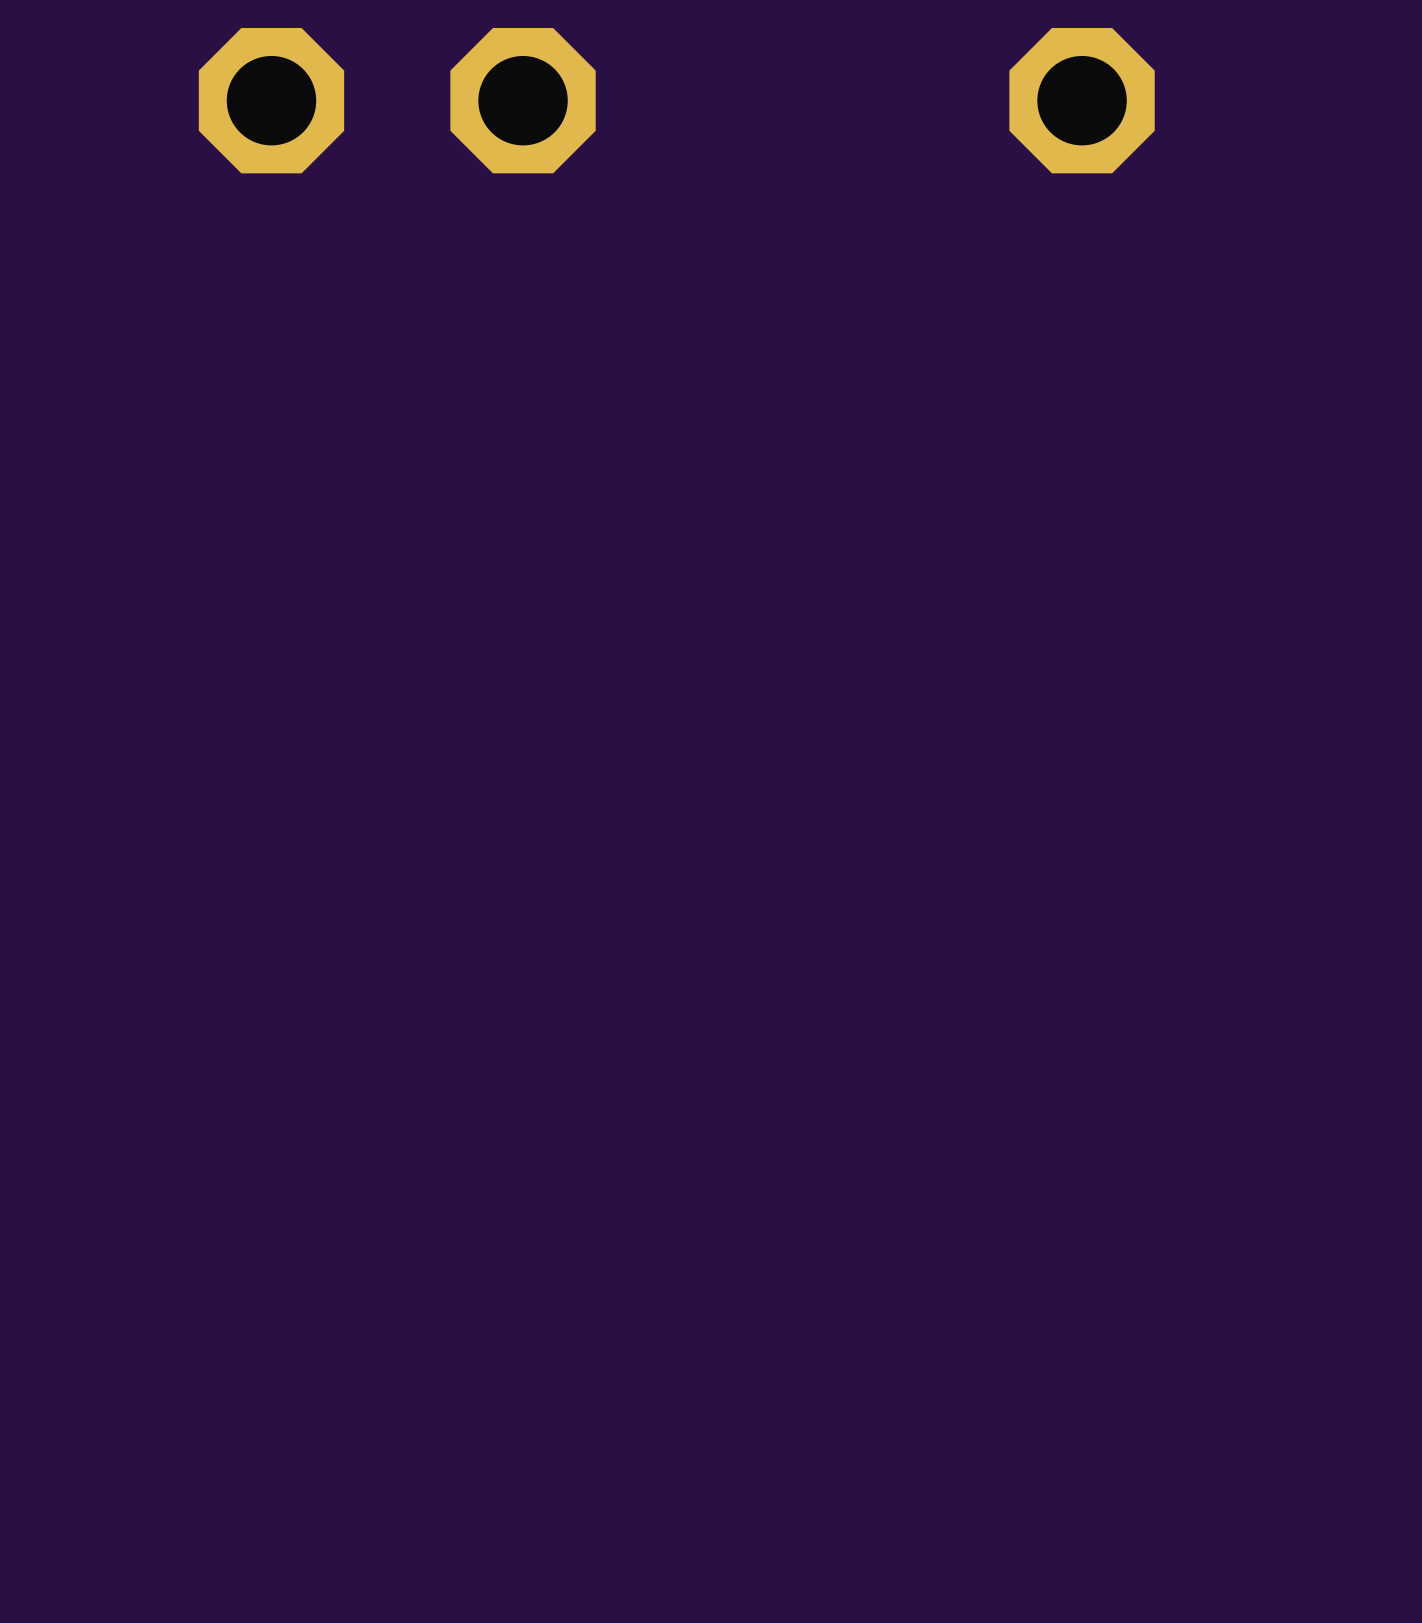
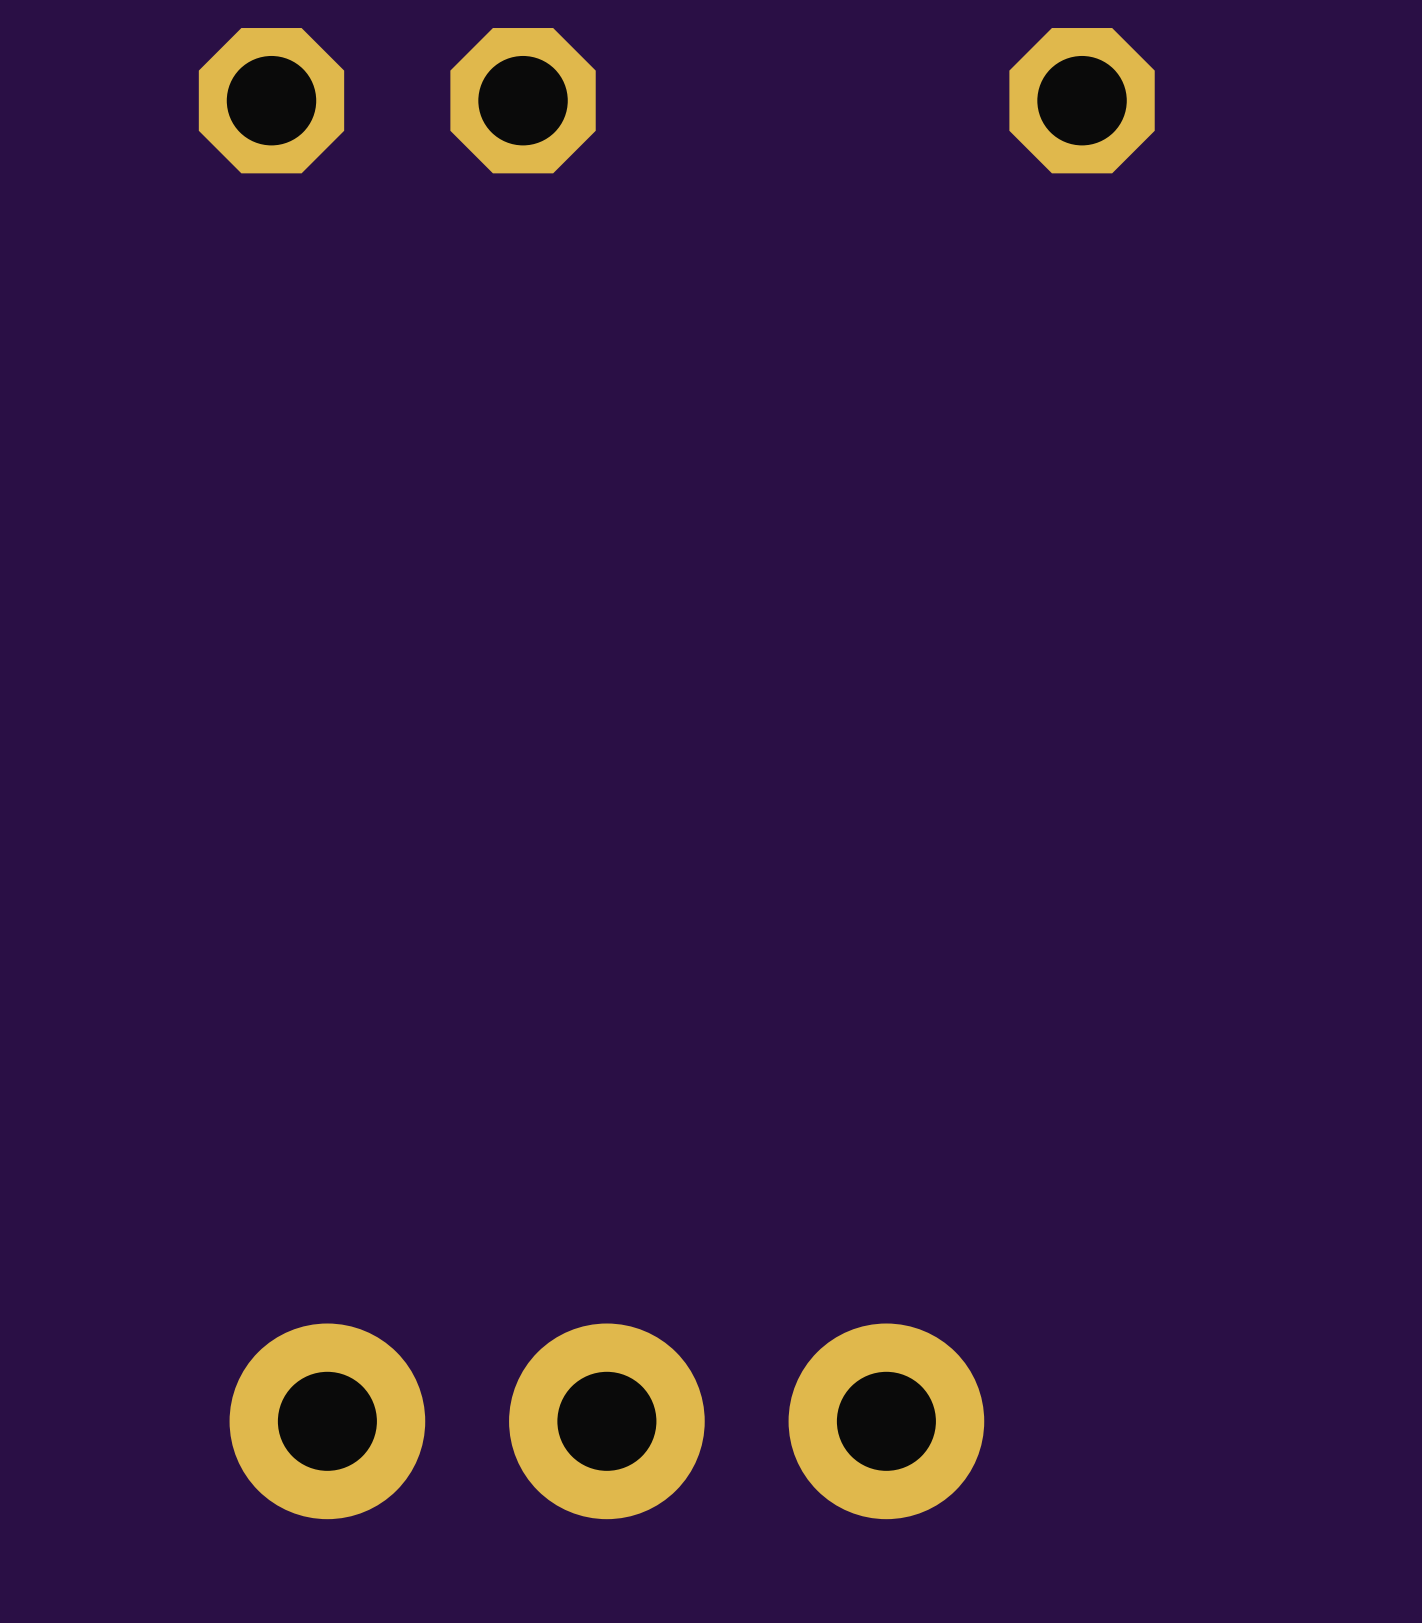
part: none -> (606, 1421)

